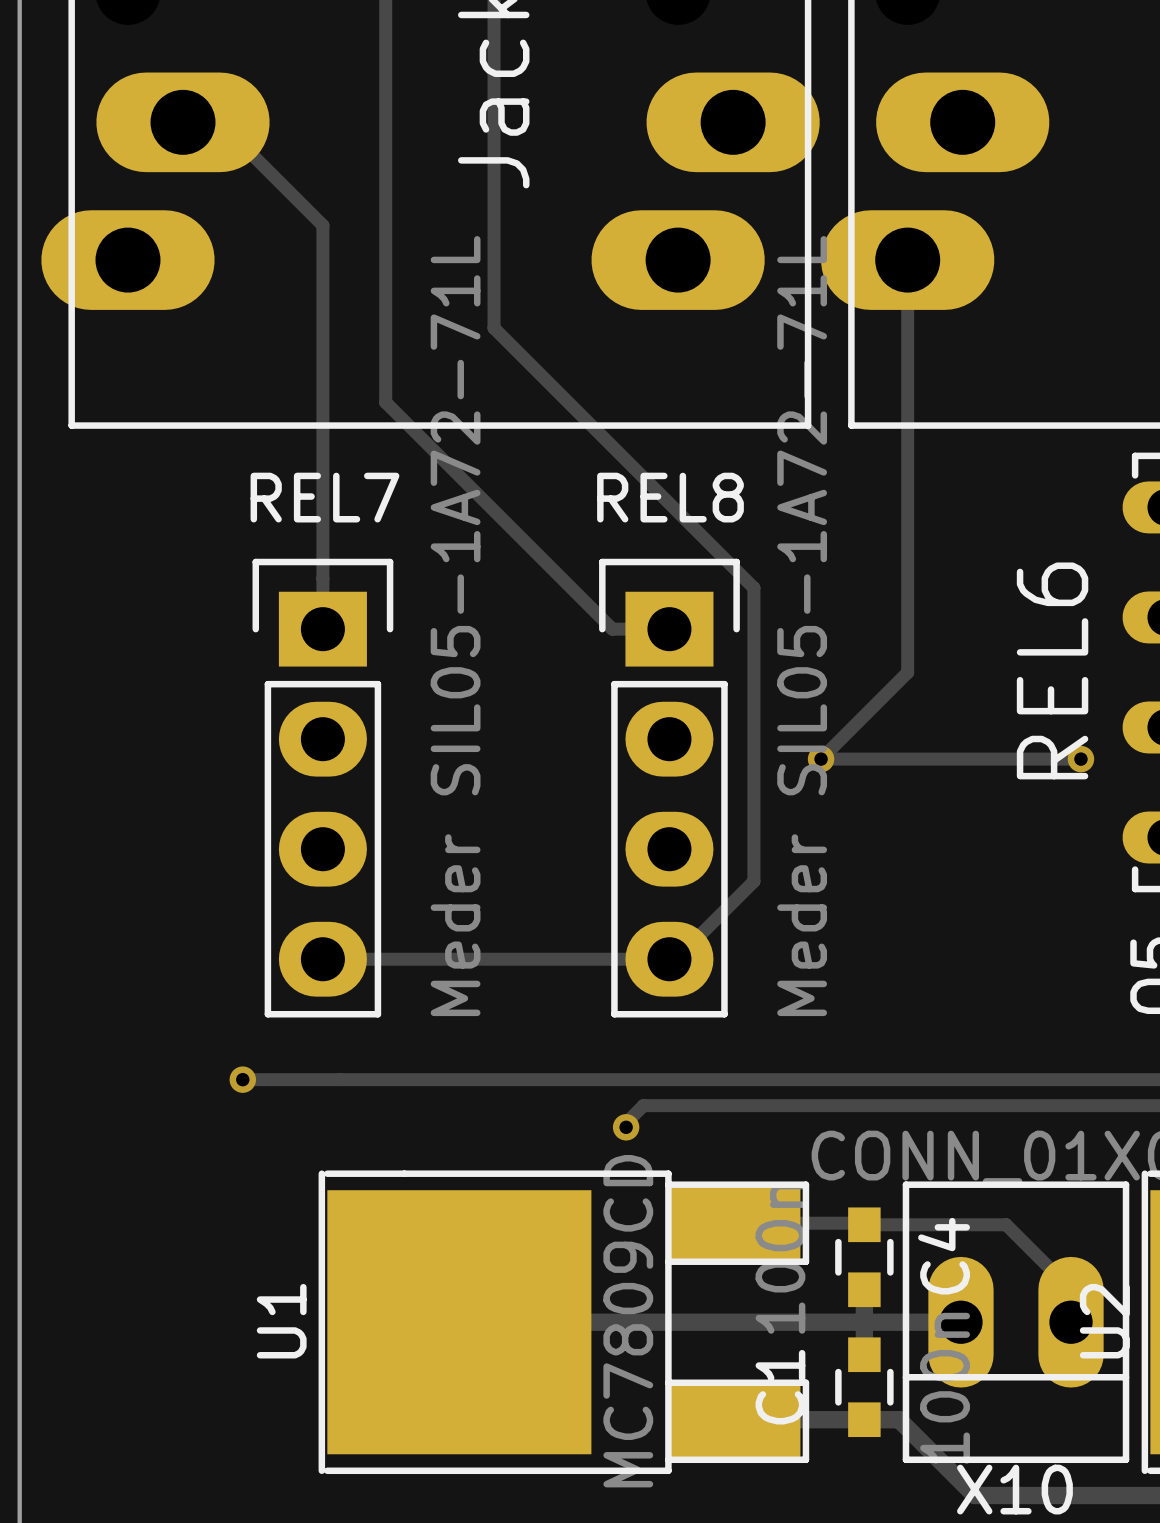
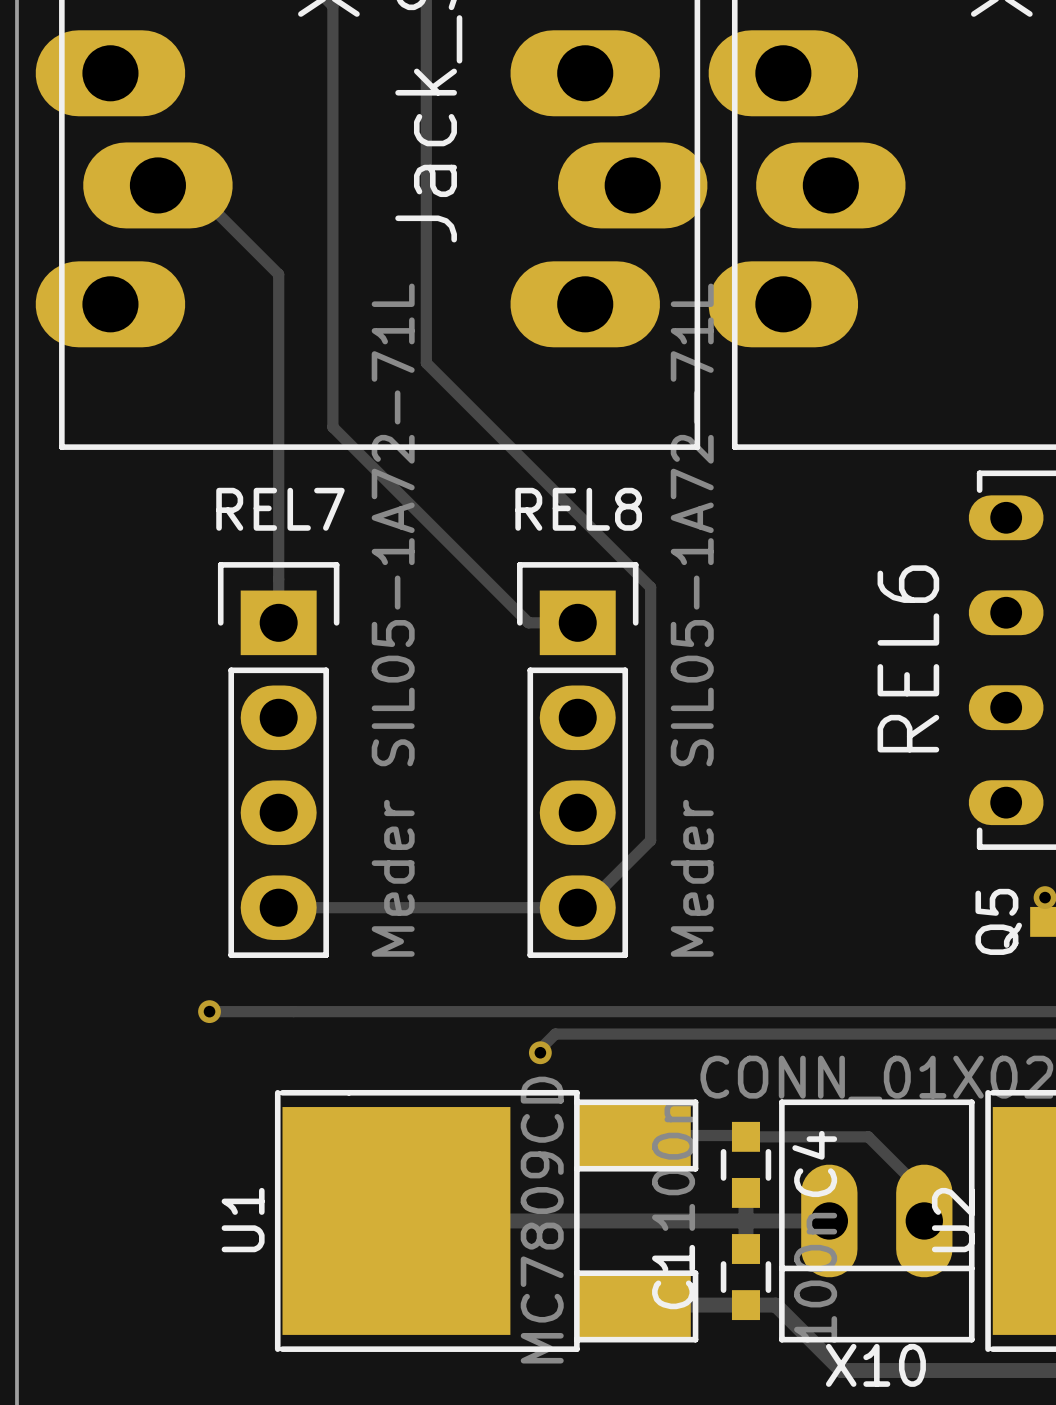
track: (907, 260) (907, 672) (821, 759) (1080, 759) -> none
via: (821, 759) -> none
via: (1080, 759) -> none

